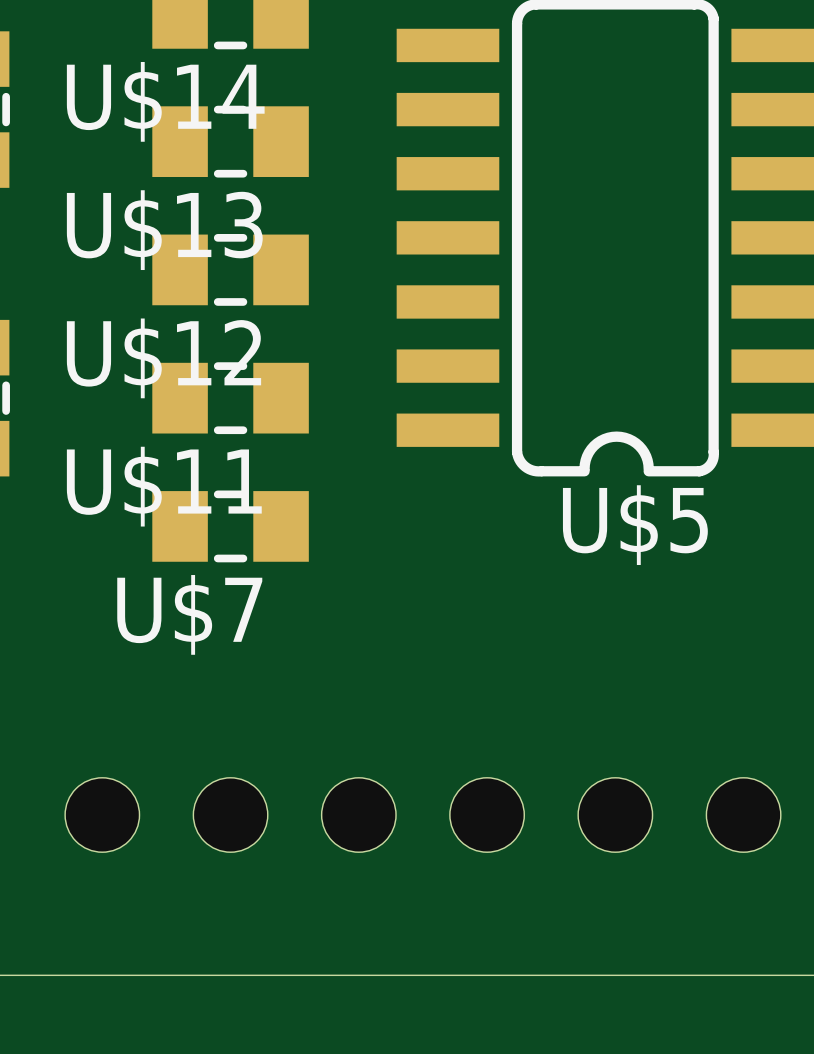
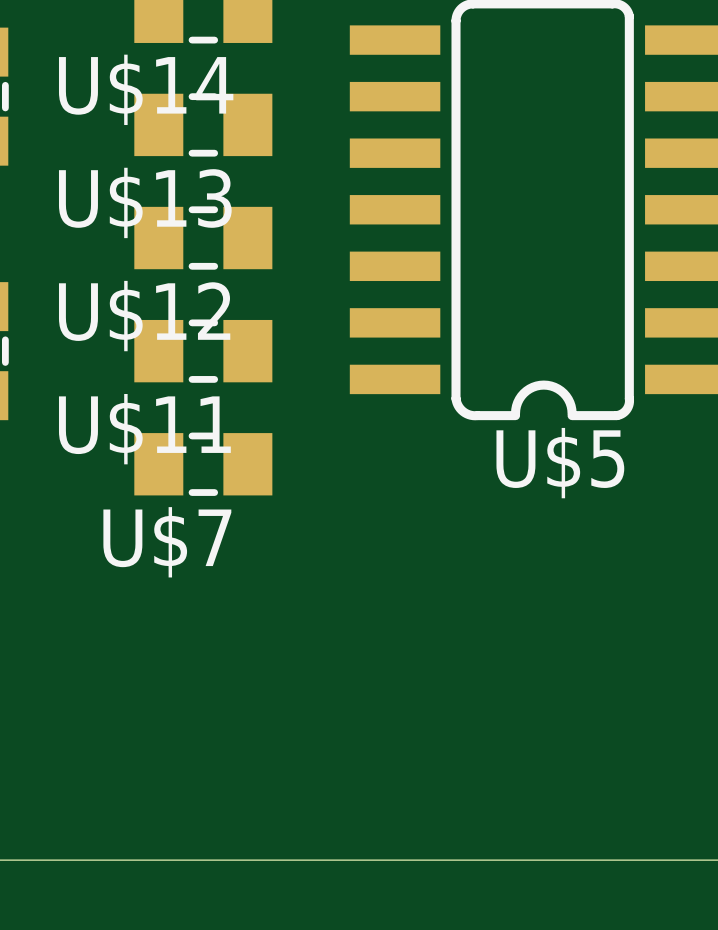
part: (422, 815) -> none

